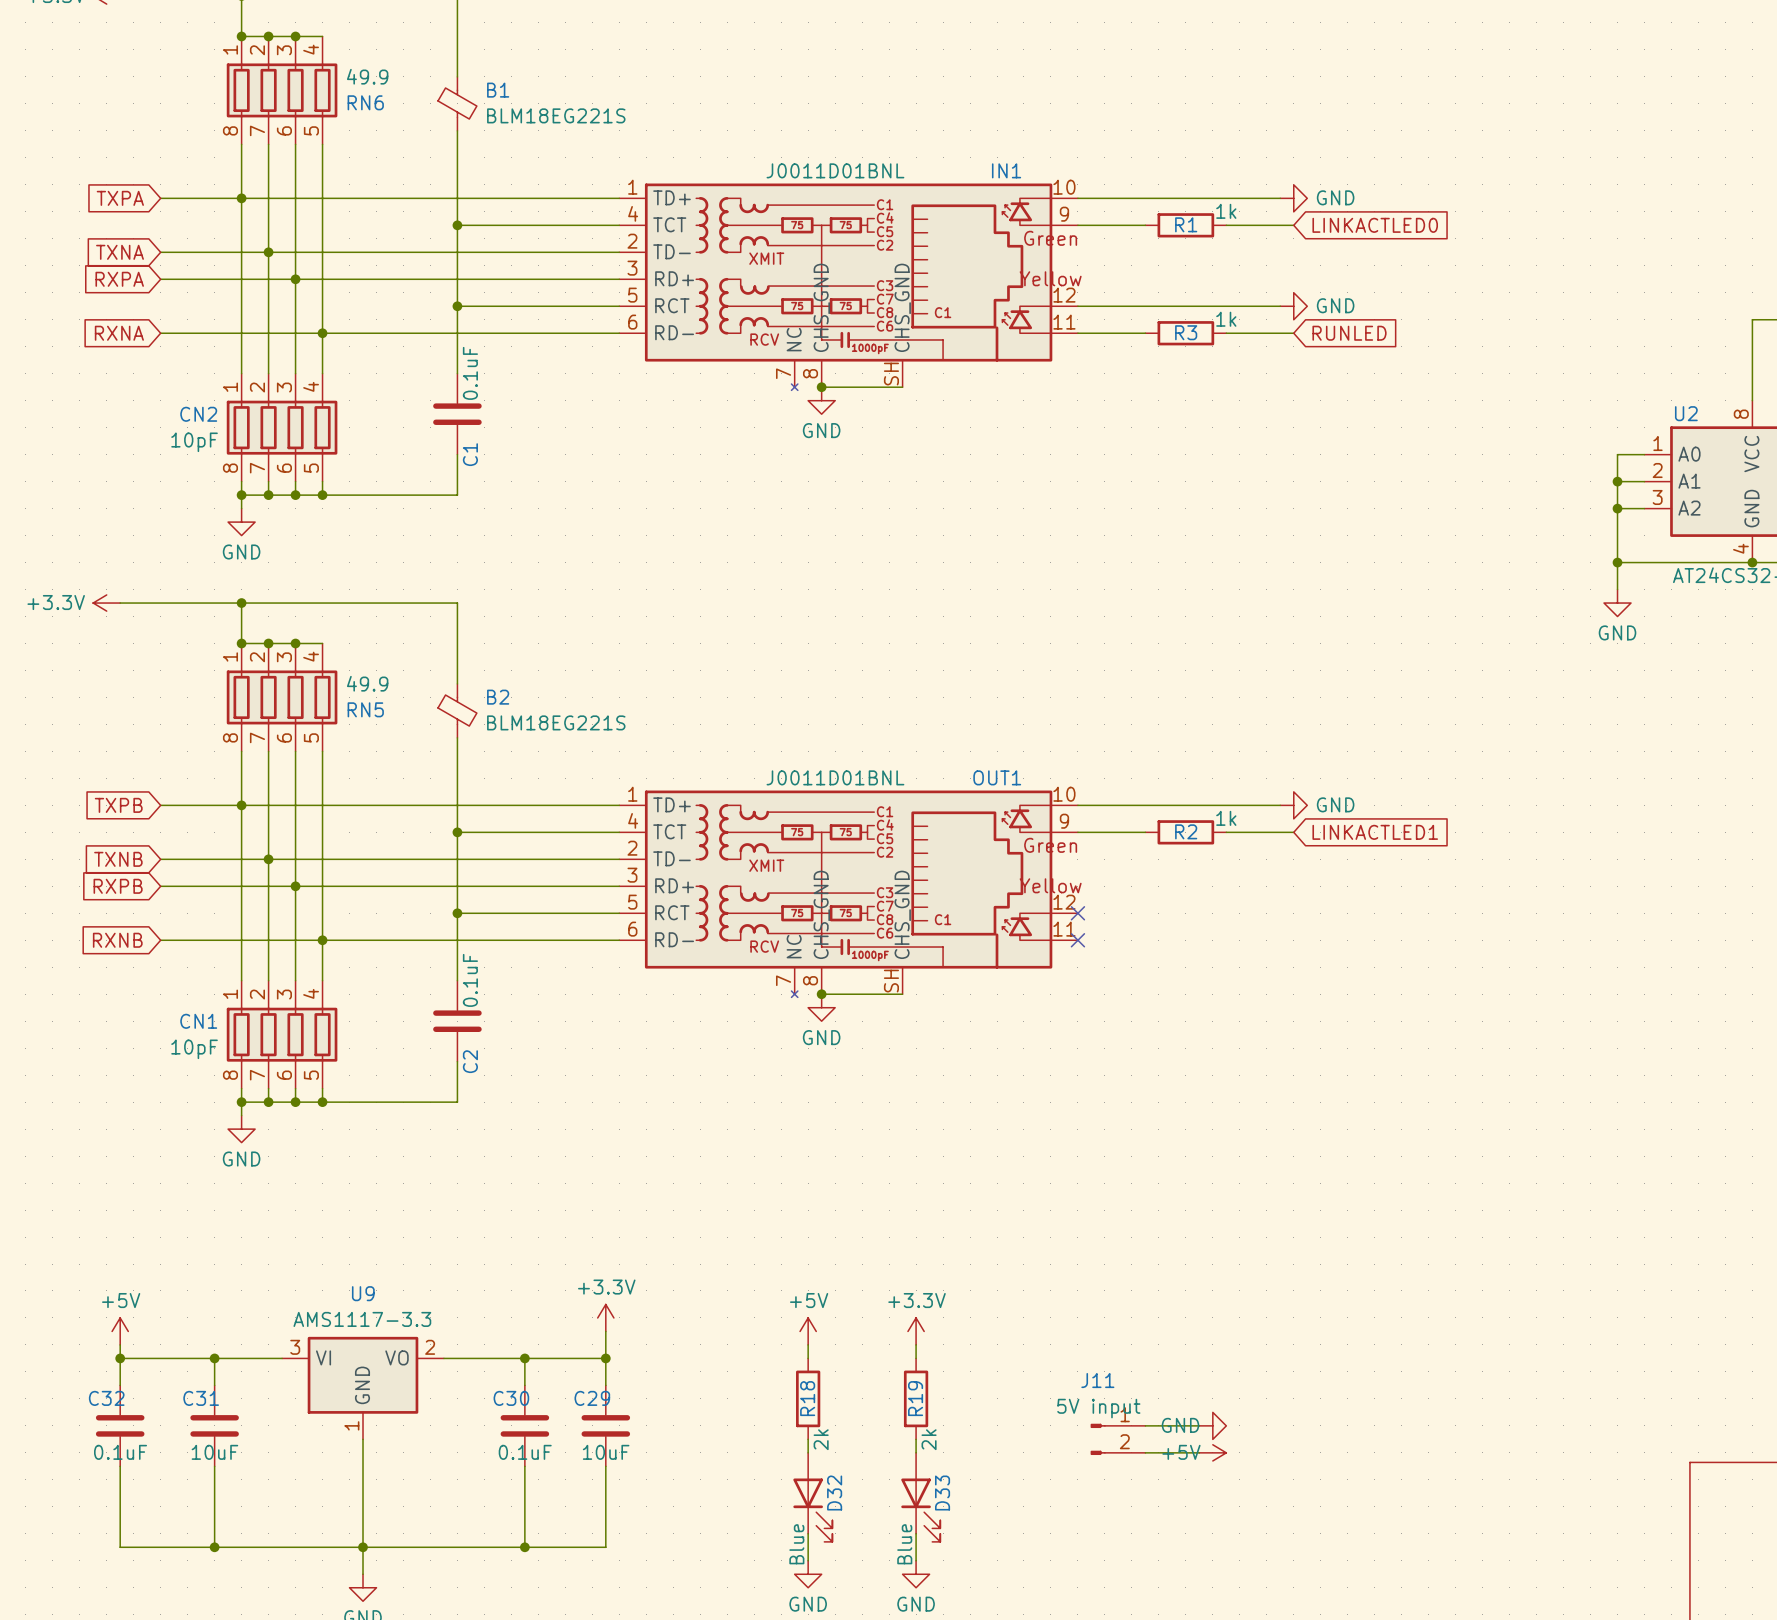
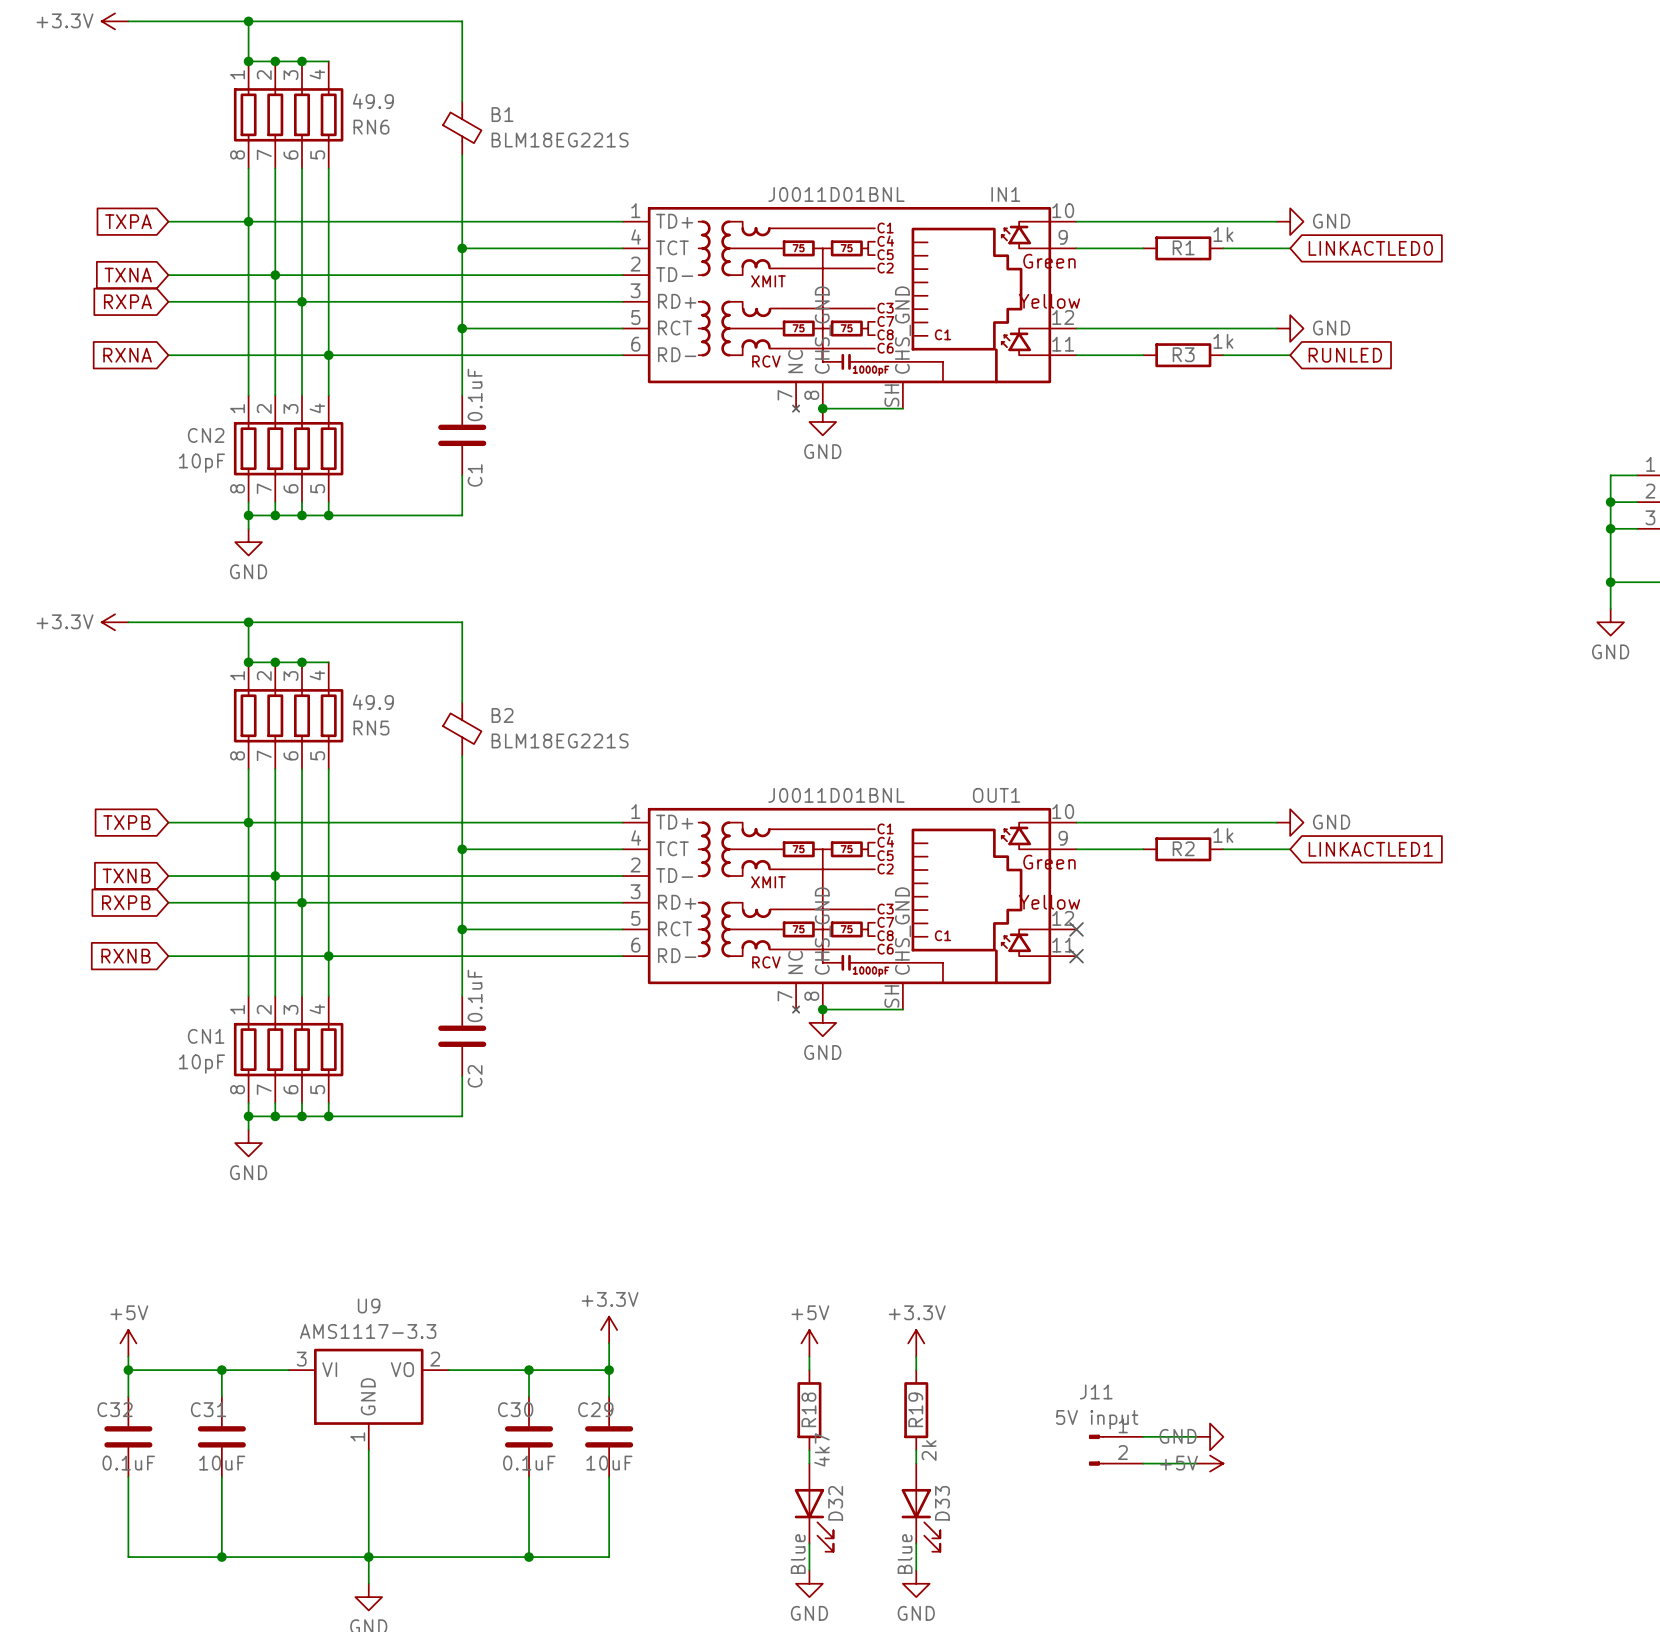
R18 value: 2k (821, 1439) -> 4k7 (821, 1449)

